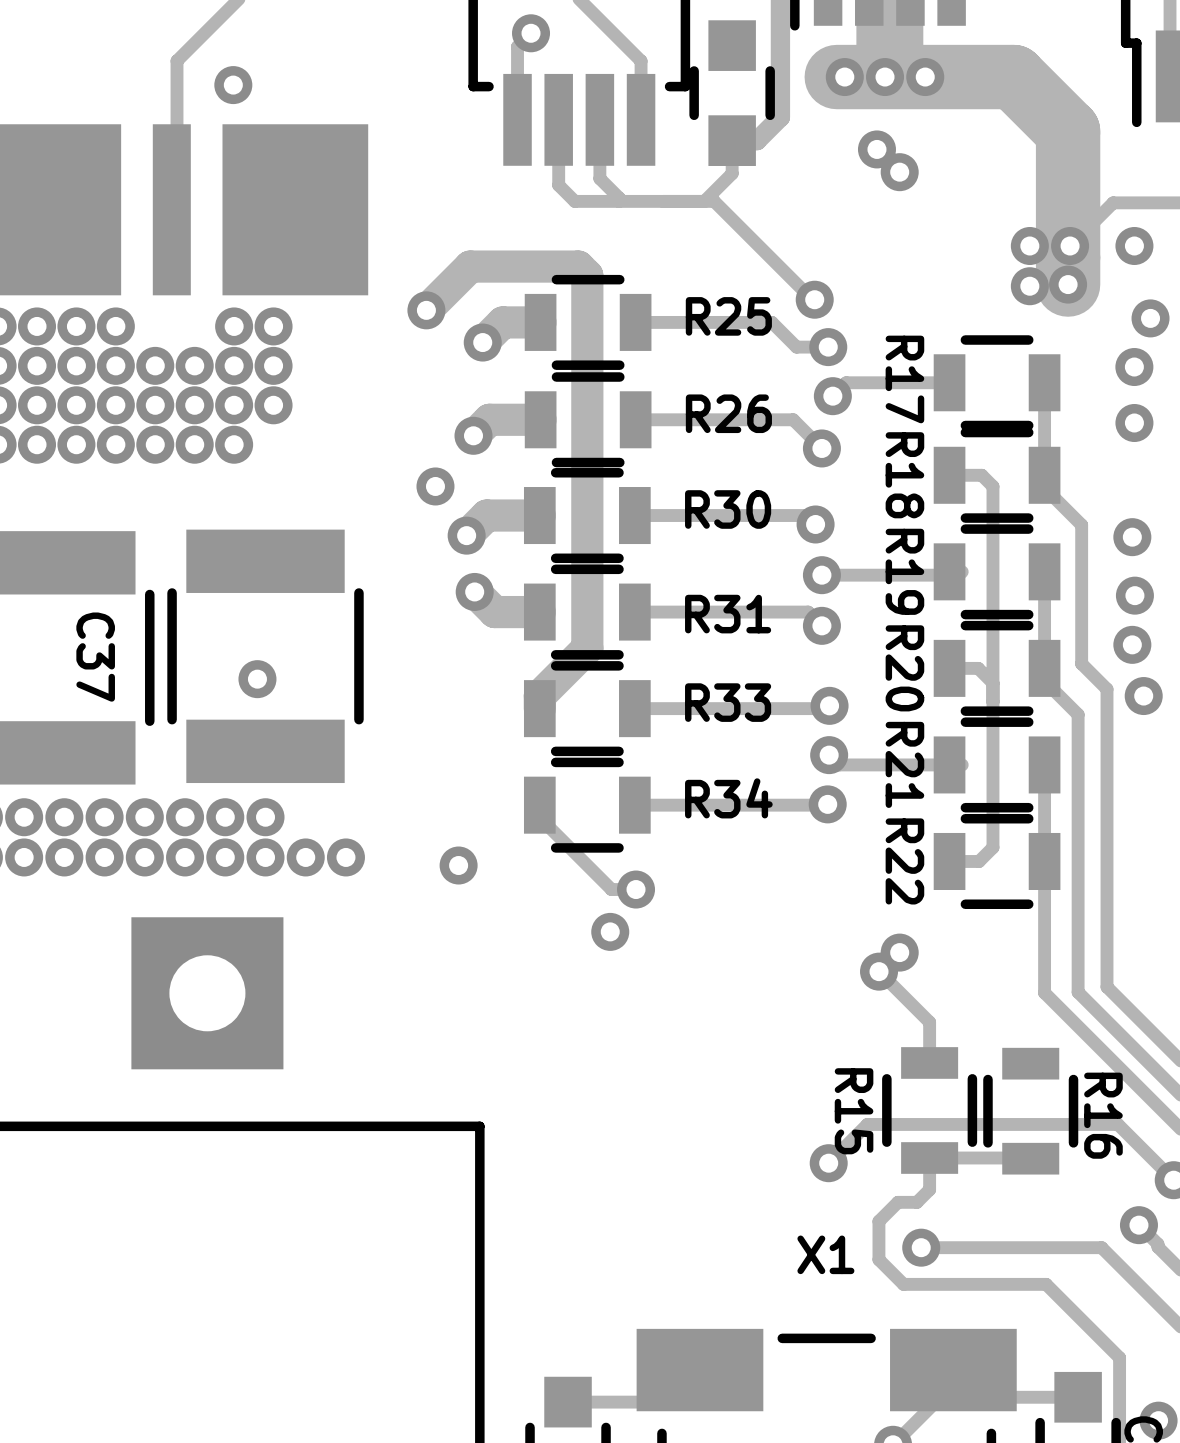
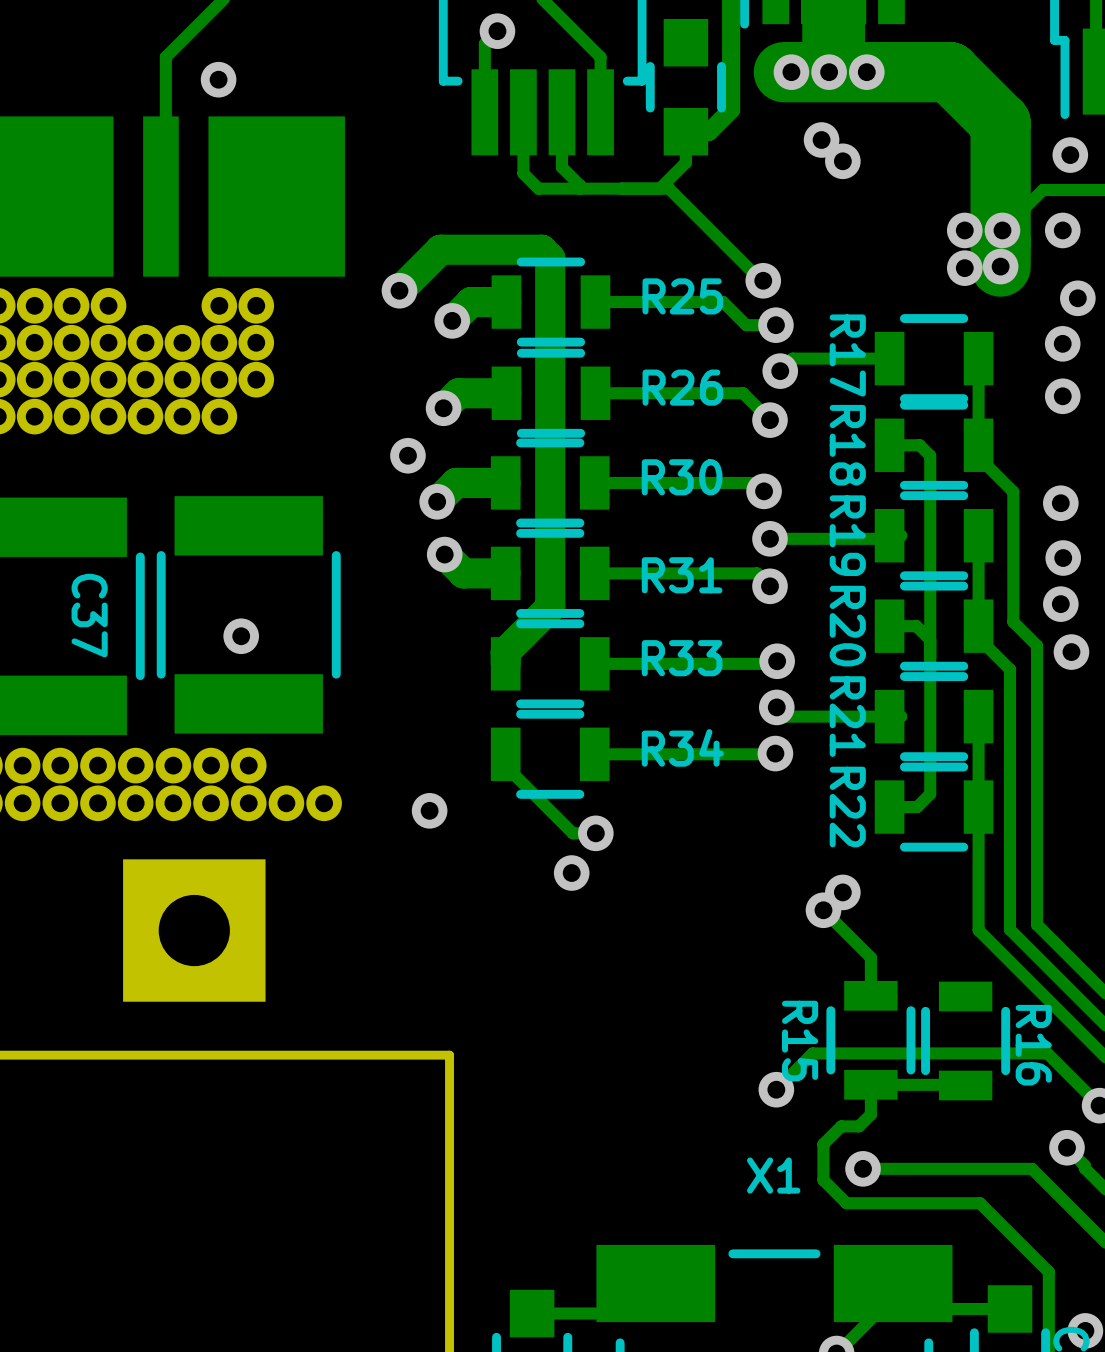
via: none -> (1070, 155)

